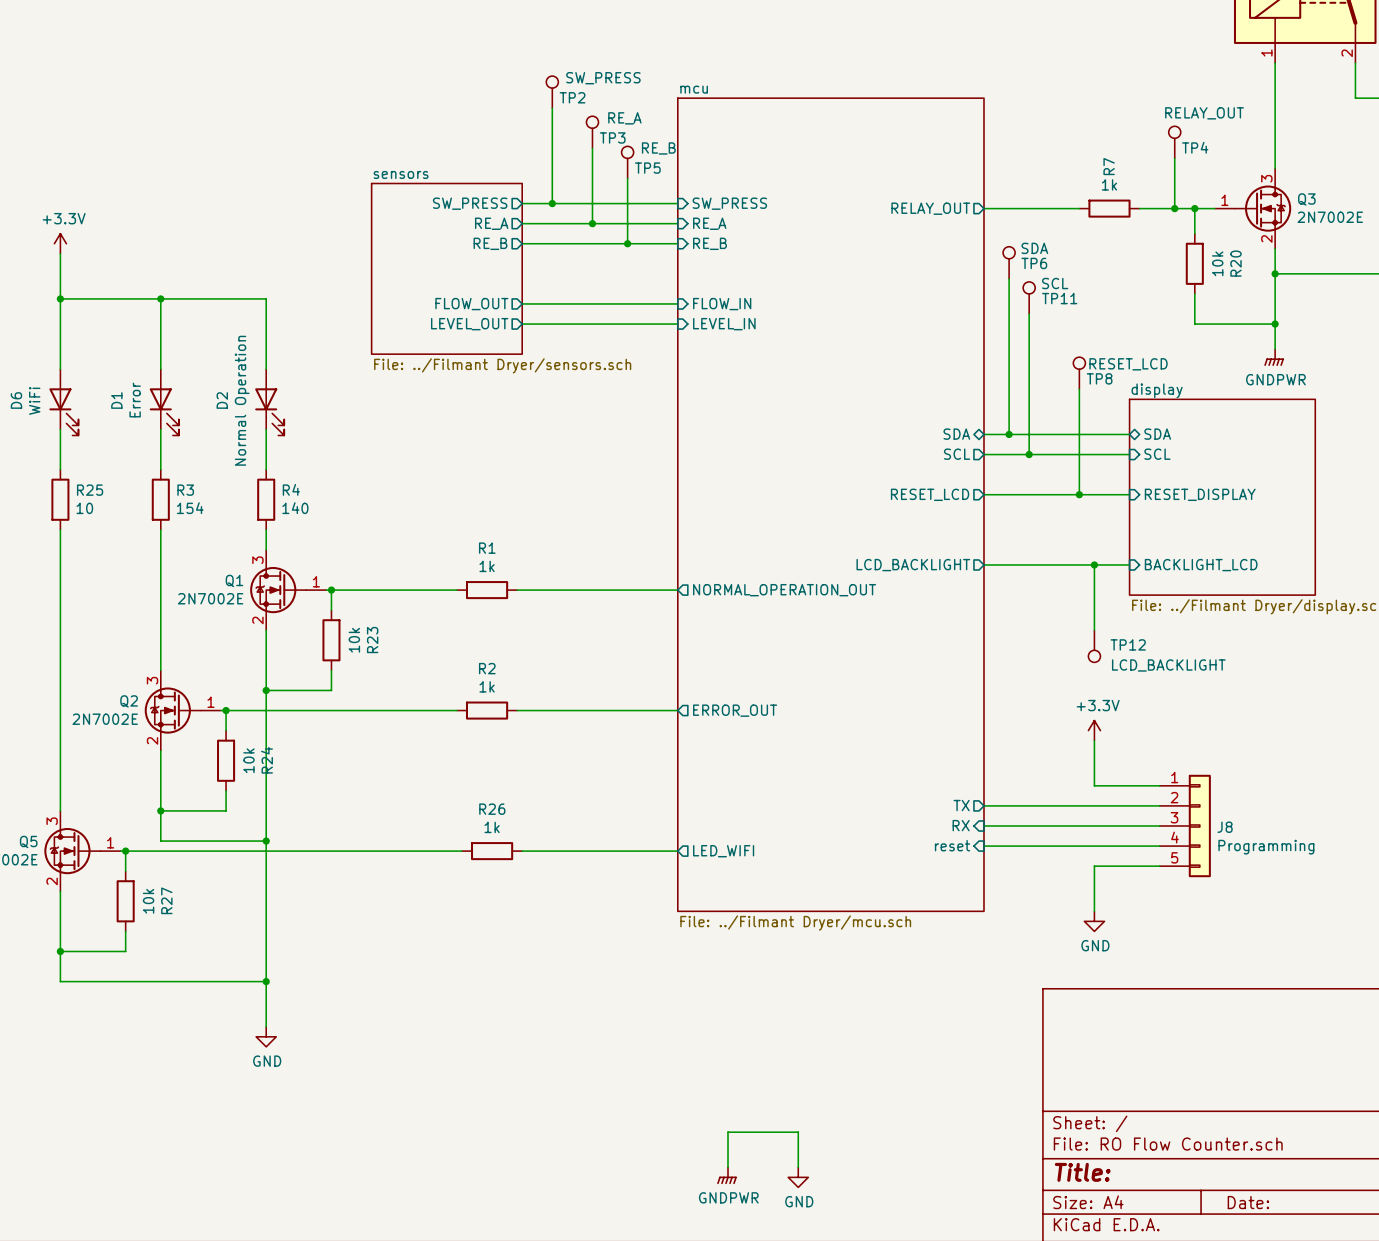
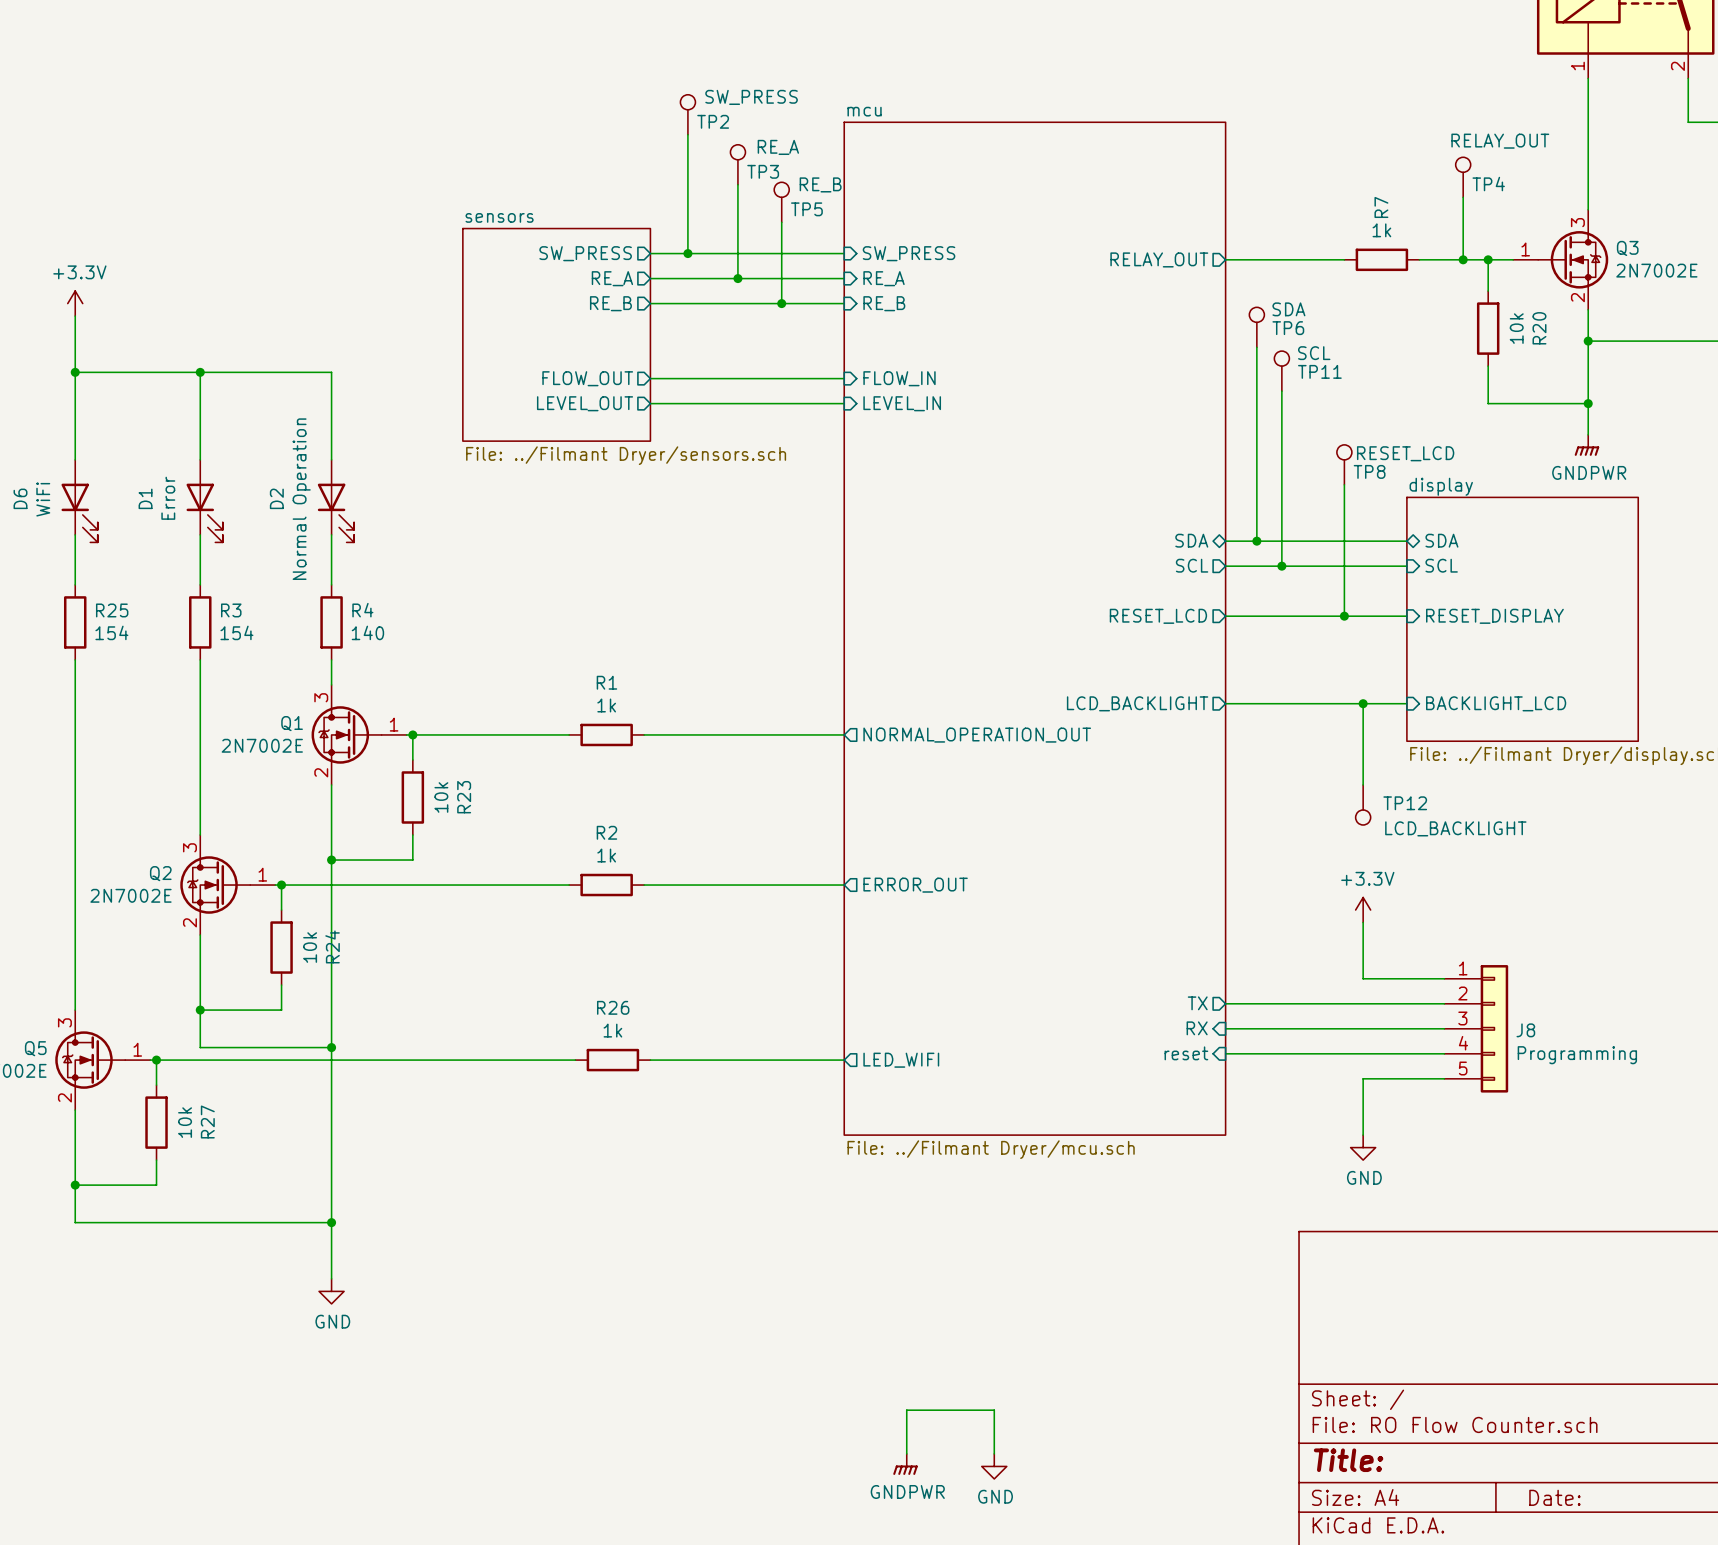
R25 value: 10 (84, 508) -> 154 (111, 632)

